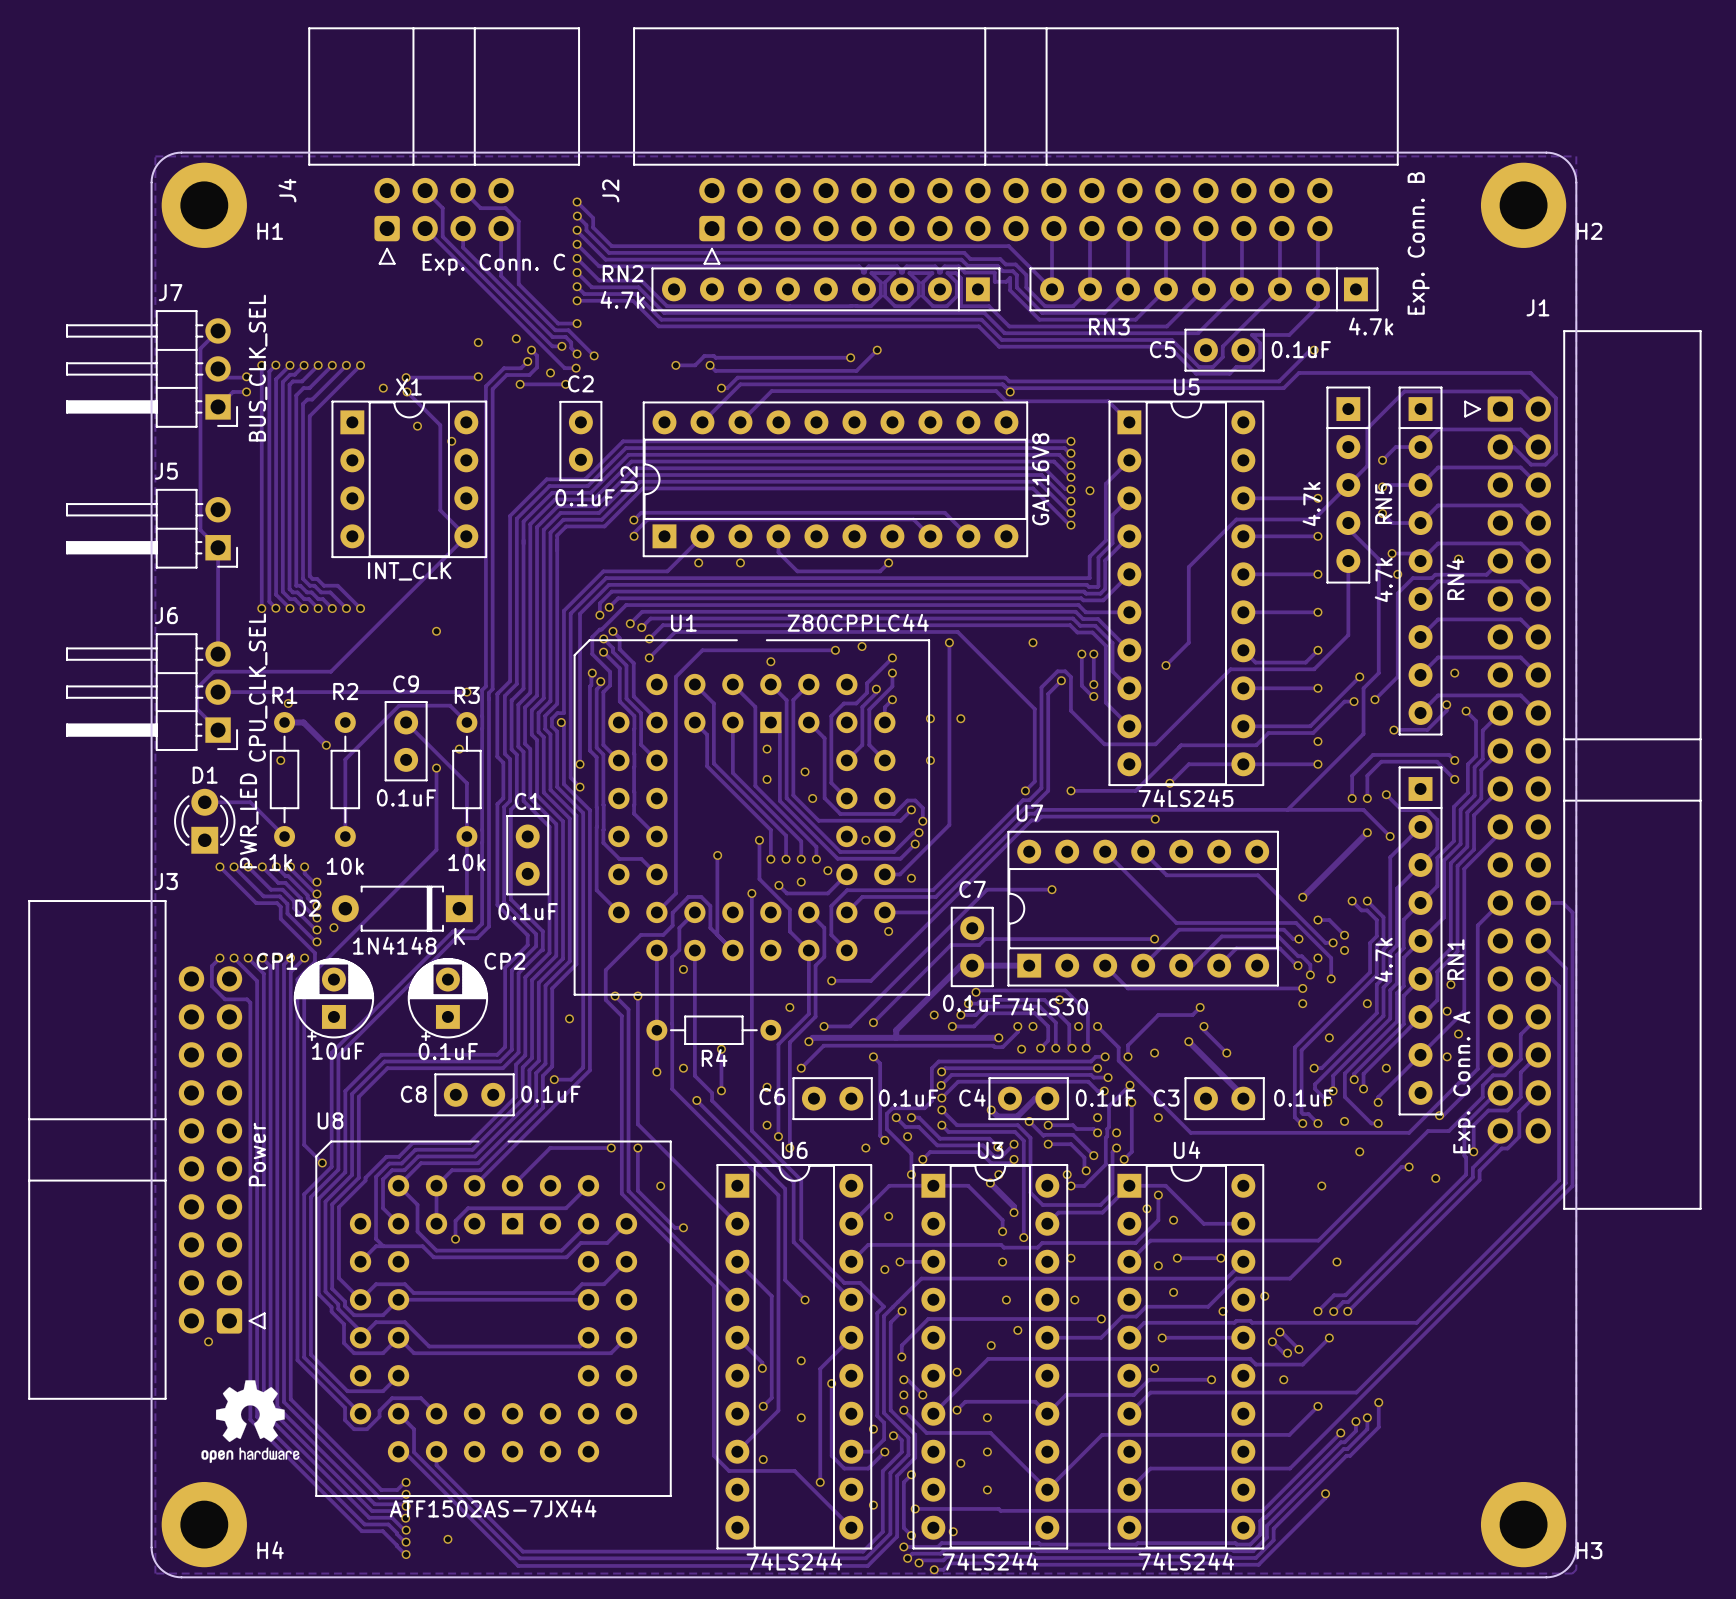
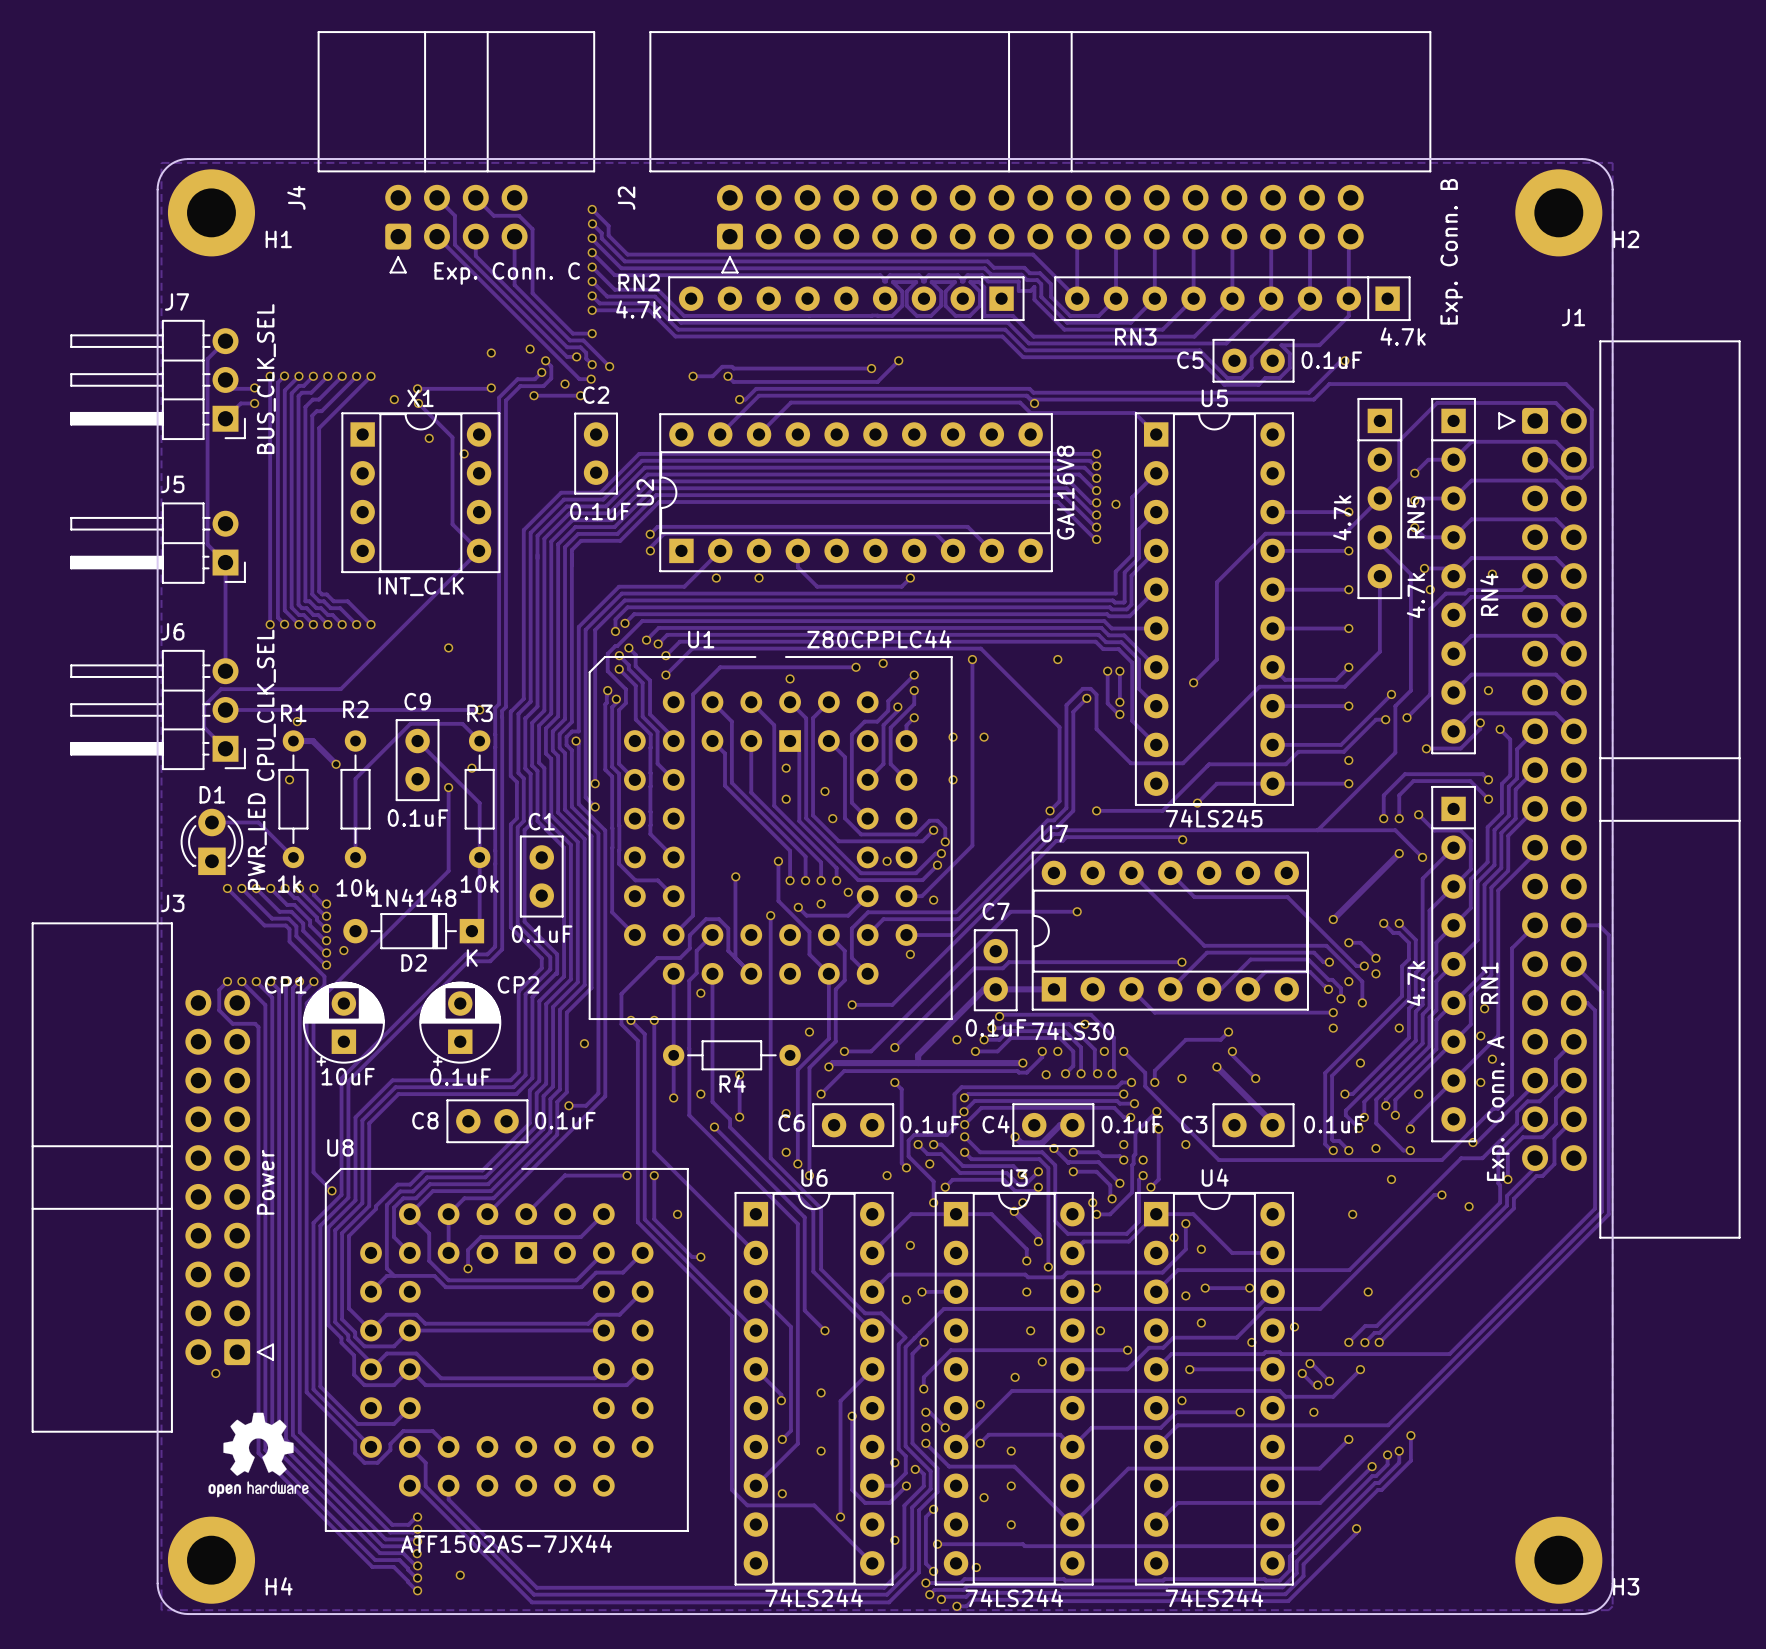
D2 footprint: [331, 885, 473, 932] -> [343, 913, 485, 950]
D2 name position: D2 (307, 908) -> D2 (414, 962)
D2 value position: 1N4148 (394, 945) -> 1N4148 (413, 897)

